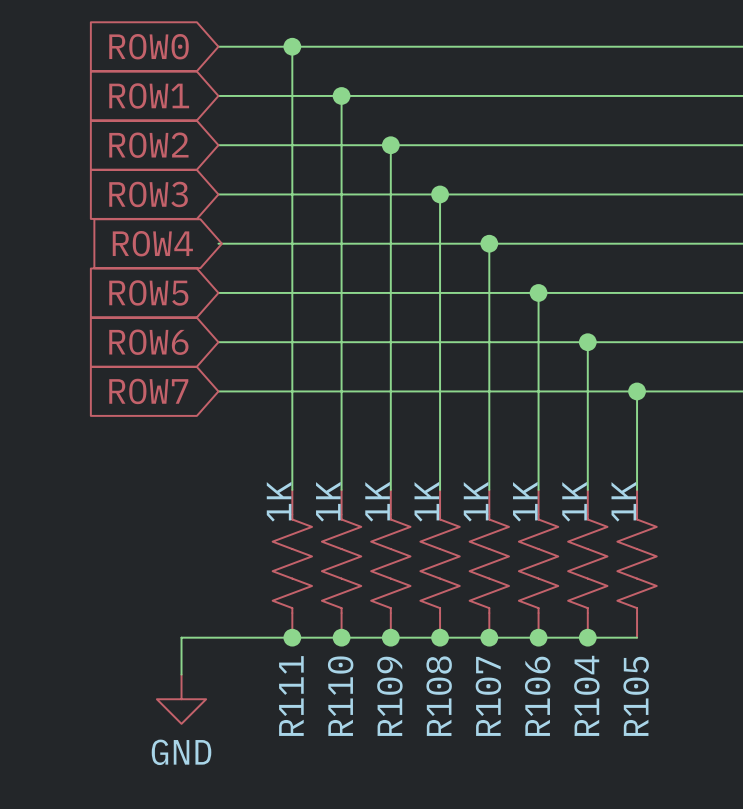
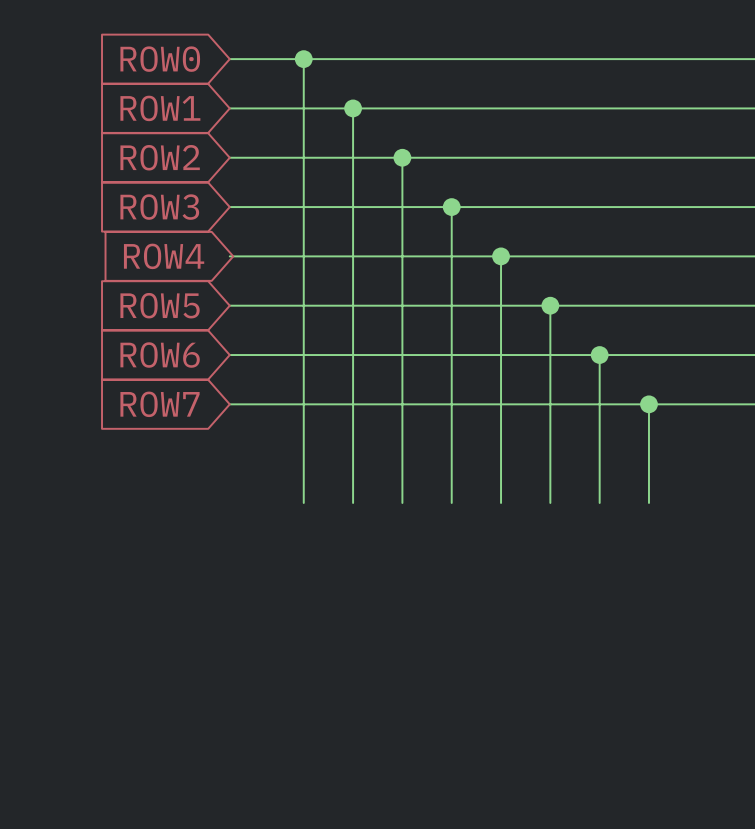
R111: 1K (292, 563) -> none
R110: 1K (341, 563) -> none
R109: 1K (390, 563) -> none
R108: 1K (440, 563) -> none
R107: 1K (489, 563) -> none
R106: 1K (538, 563) -> none
R104: 1K (587, 563) -> none
R105: 1K (637, 563) -> none
junction: (292, 637) -> none
junction: (341, 637) -> none
junction: (390, 637) -> none
junction: (440, 637) -> none
junction: (489, 637) -> none
junction: (538, 637) -> none
junction: (587, 637) -> none
wire: (637, 637) (181, 637) (181, 674) -> none
power symbol: GND (181, 699) -> none

